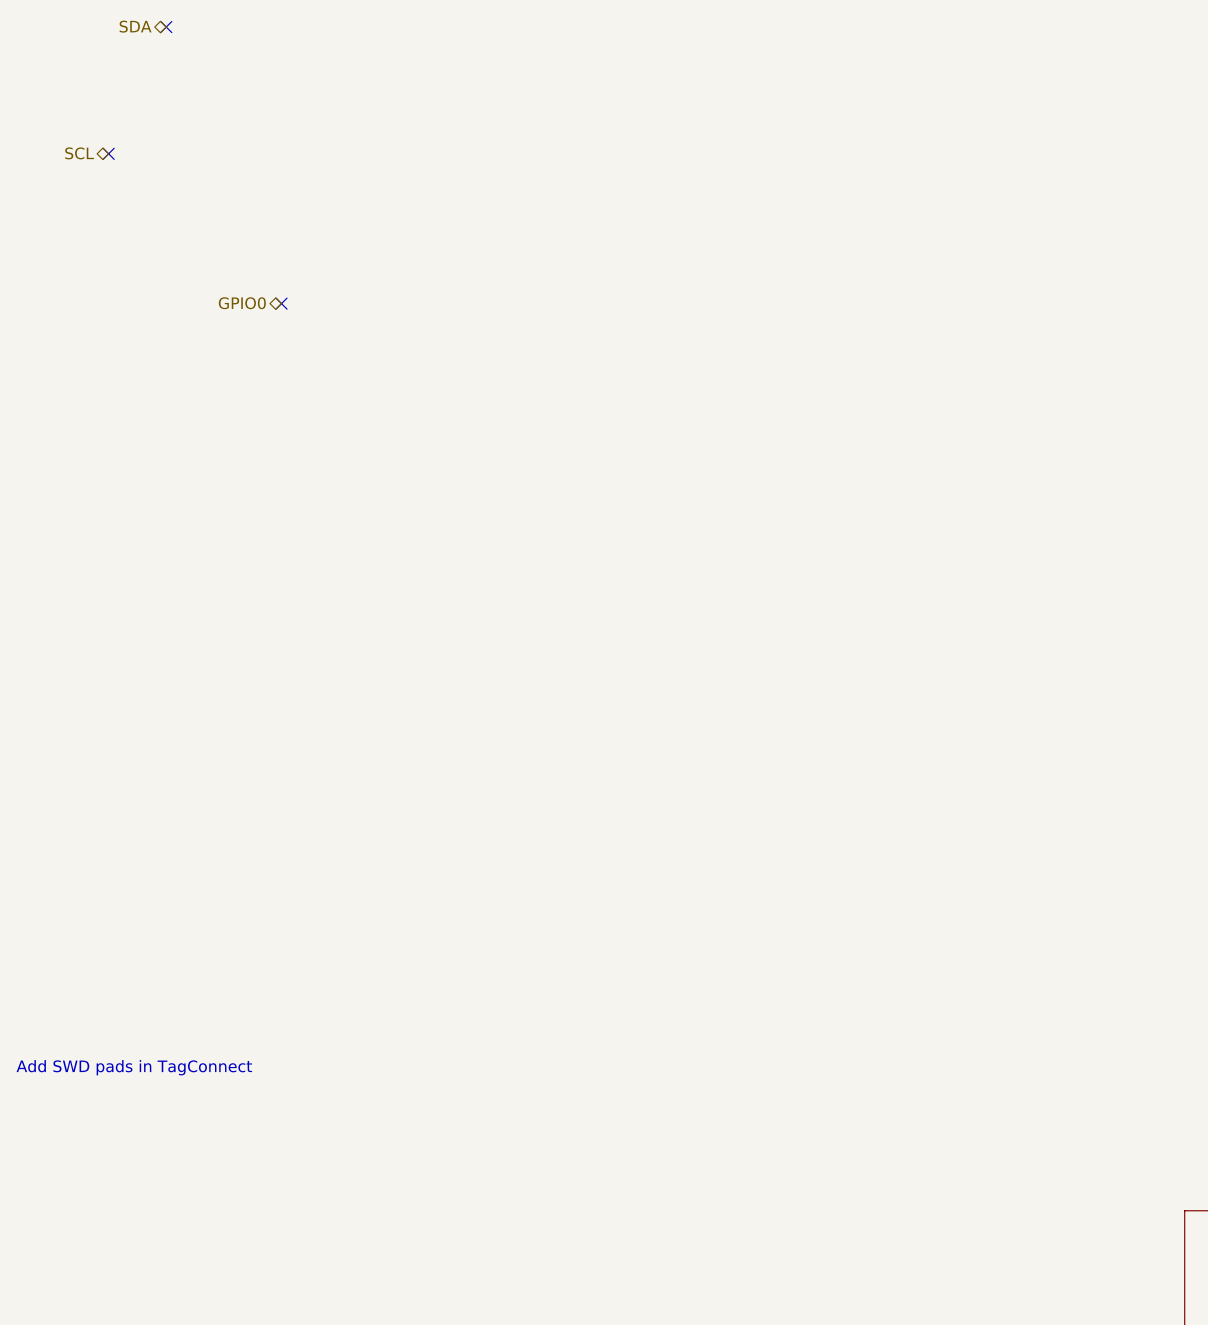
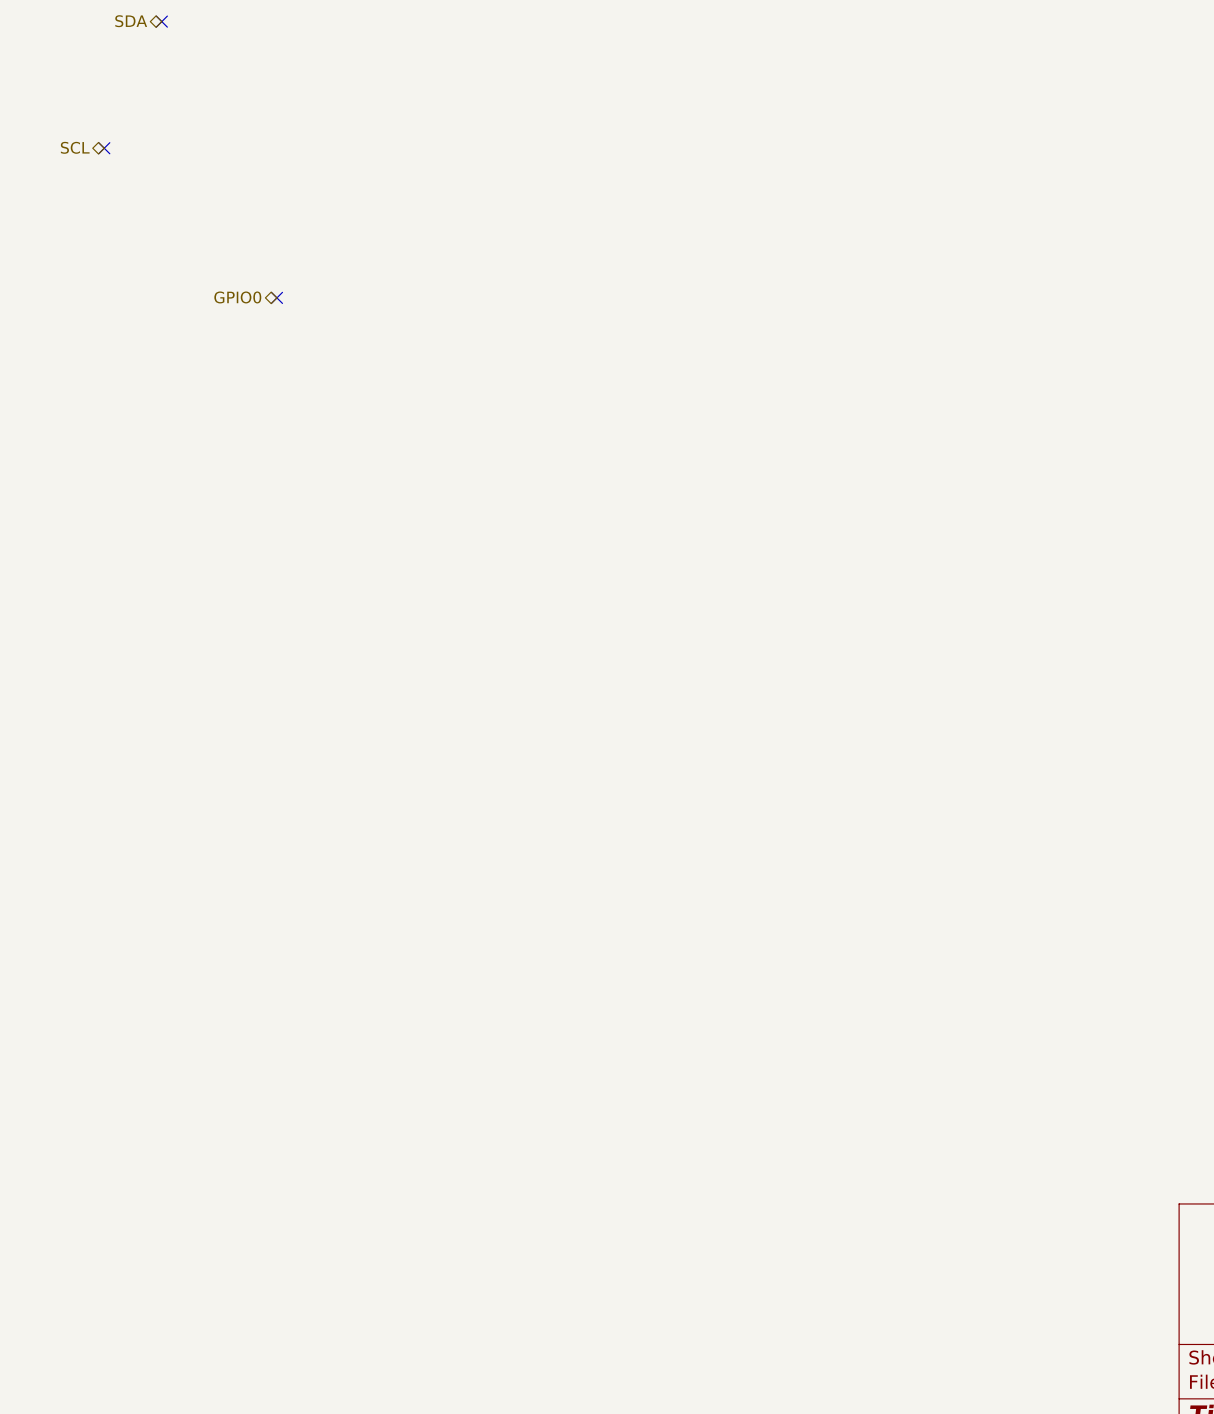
text: Add SWD pads in TagConnect (134, 1067) -> none

